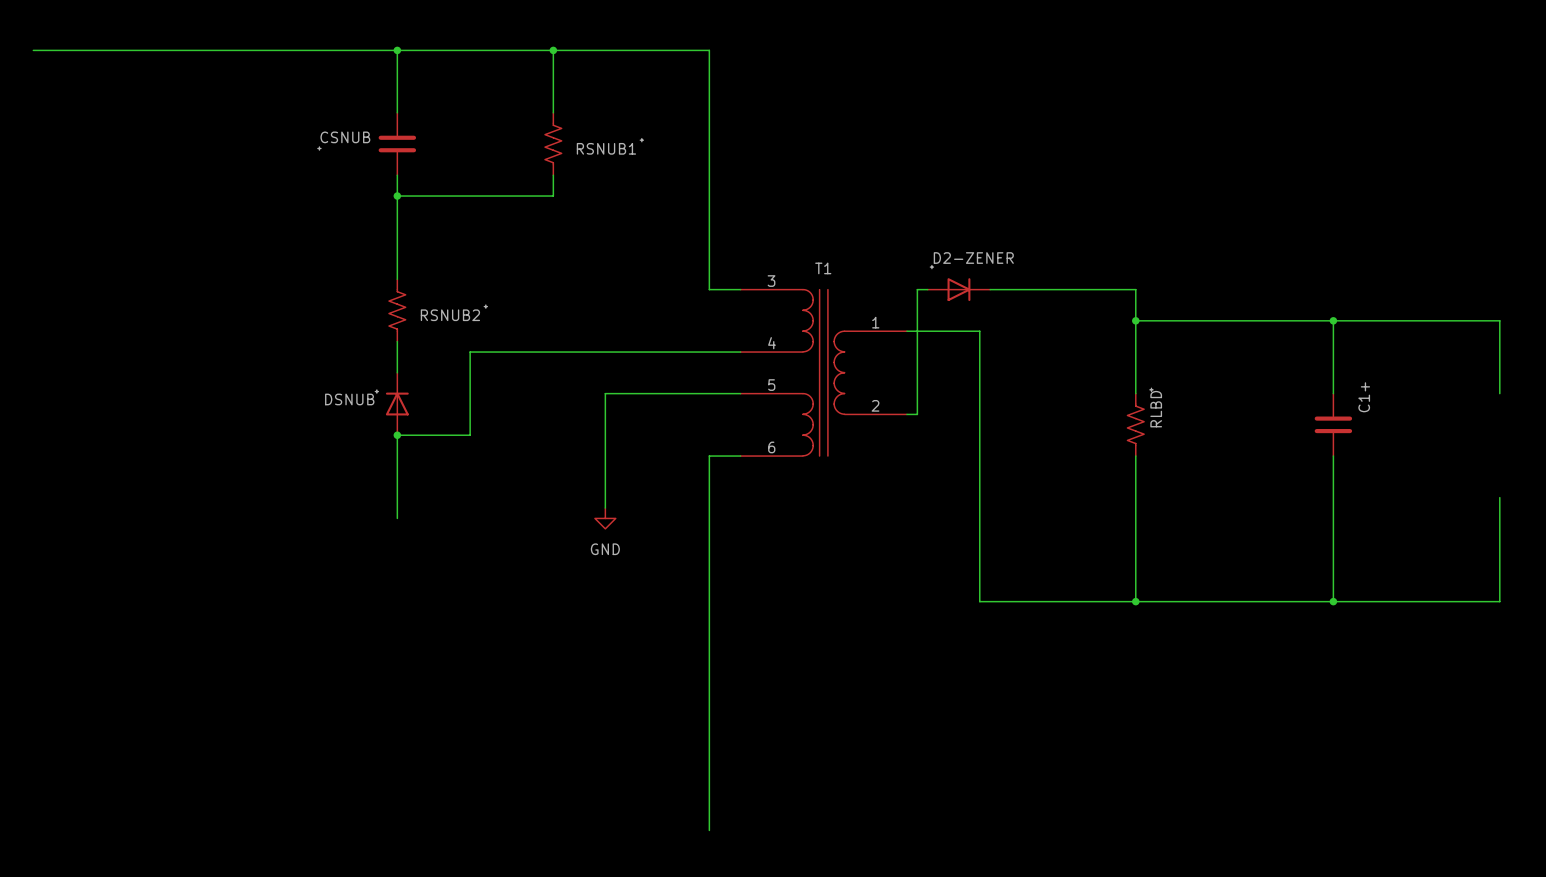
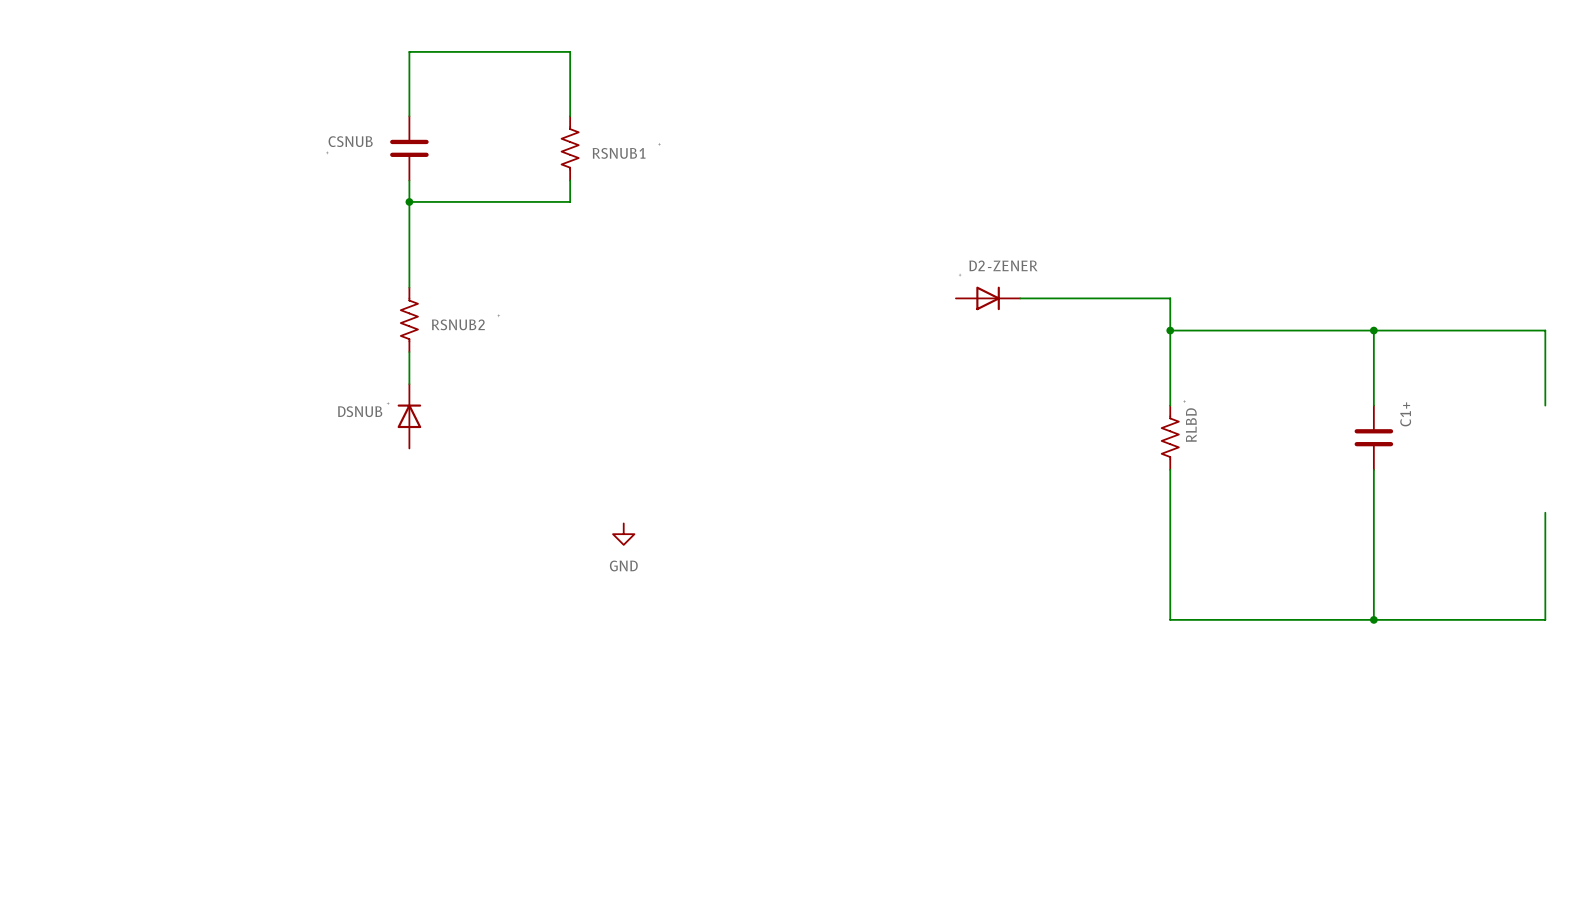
wire: (33, 50) (397, 50) -> none
junction: (397, 50) -> none
wire: (553, 50) (709, 50) (709, 289) (740, 289) -> none
junction: (553, 50) -> none
wire: (927, 289) (917, 289) (917, 414) (906, 414) -> none
wire: (906, 331) (979, 331) (979, 601) (1135, 601) -> none
wire: (740, 352) (470, 352) (470, 435) (397, 435) (397, 518) -> none
part: T1 (823, 372) -> none
wire: (740, 393) (605, 393) (605, 508) -> none
junction: (397, 435) -> none
wire: (740, 456) (709, 456) (709, 830) -> none
junction: (1135, 601) -> none

